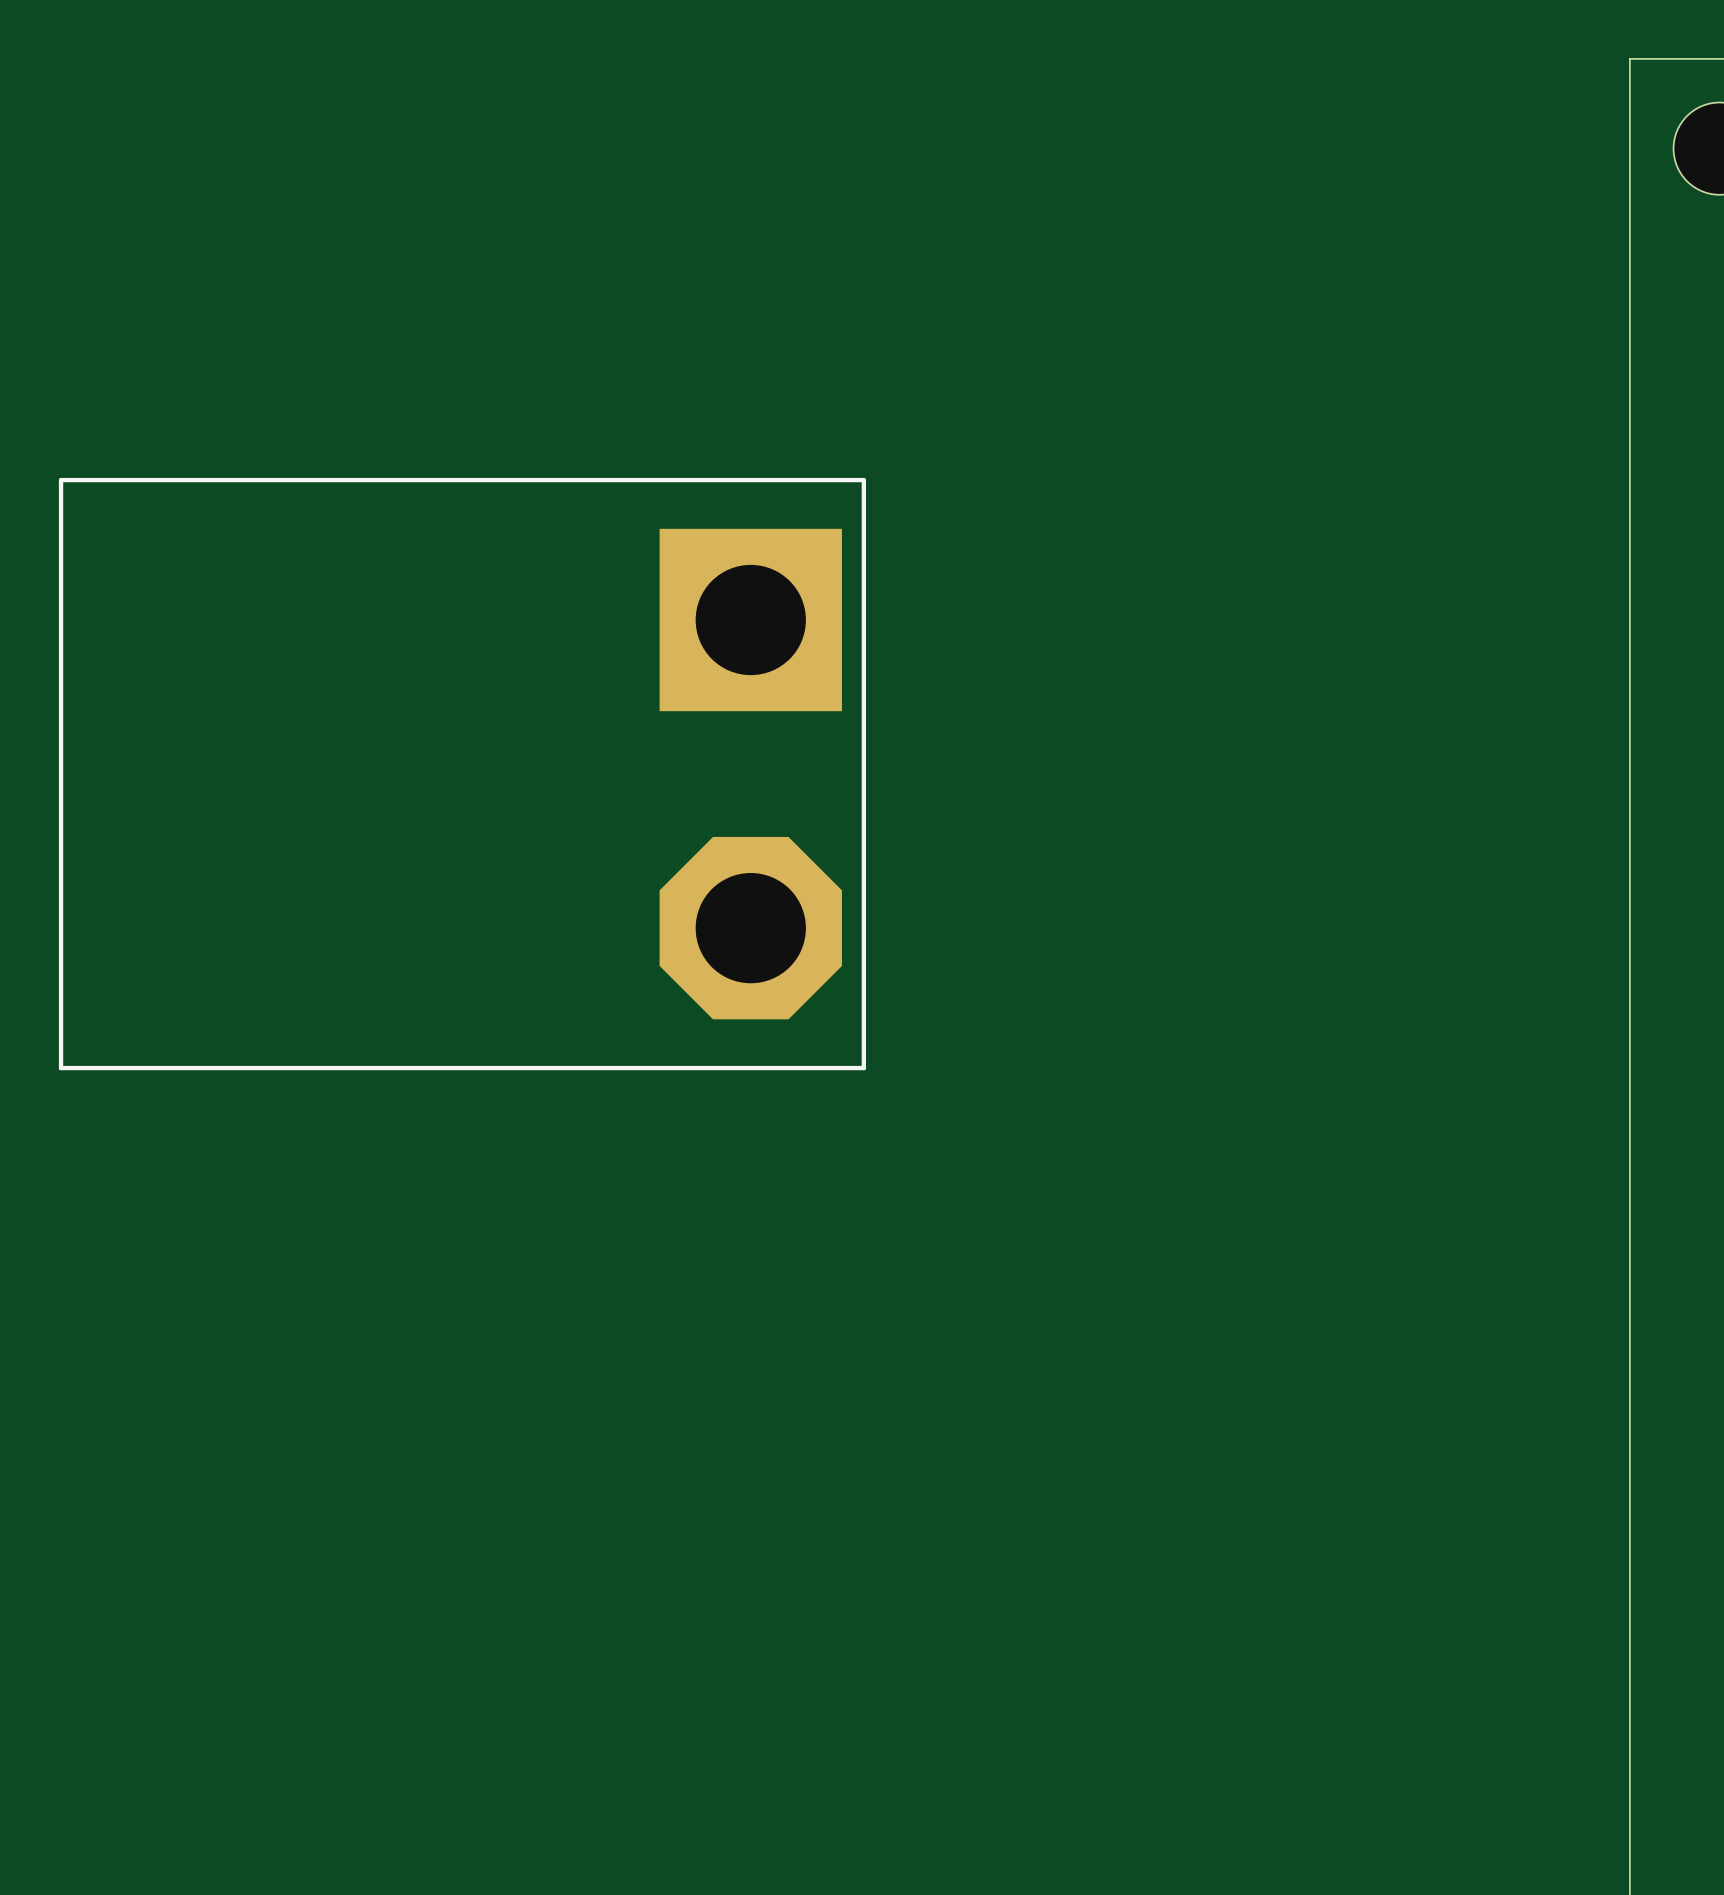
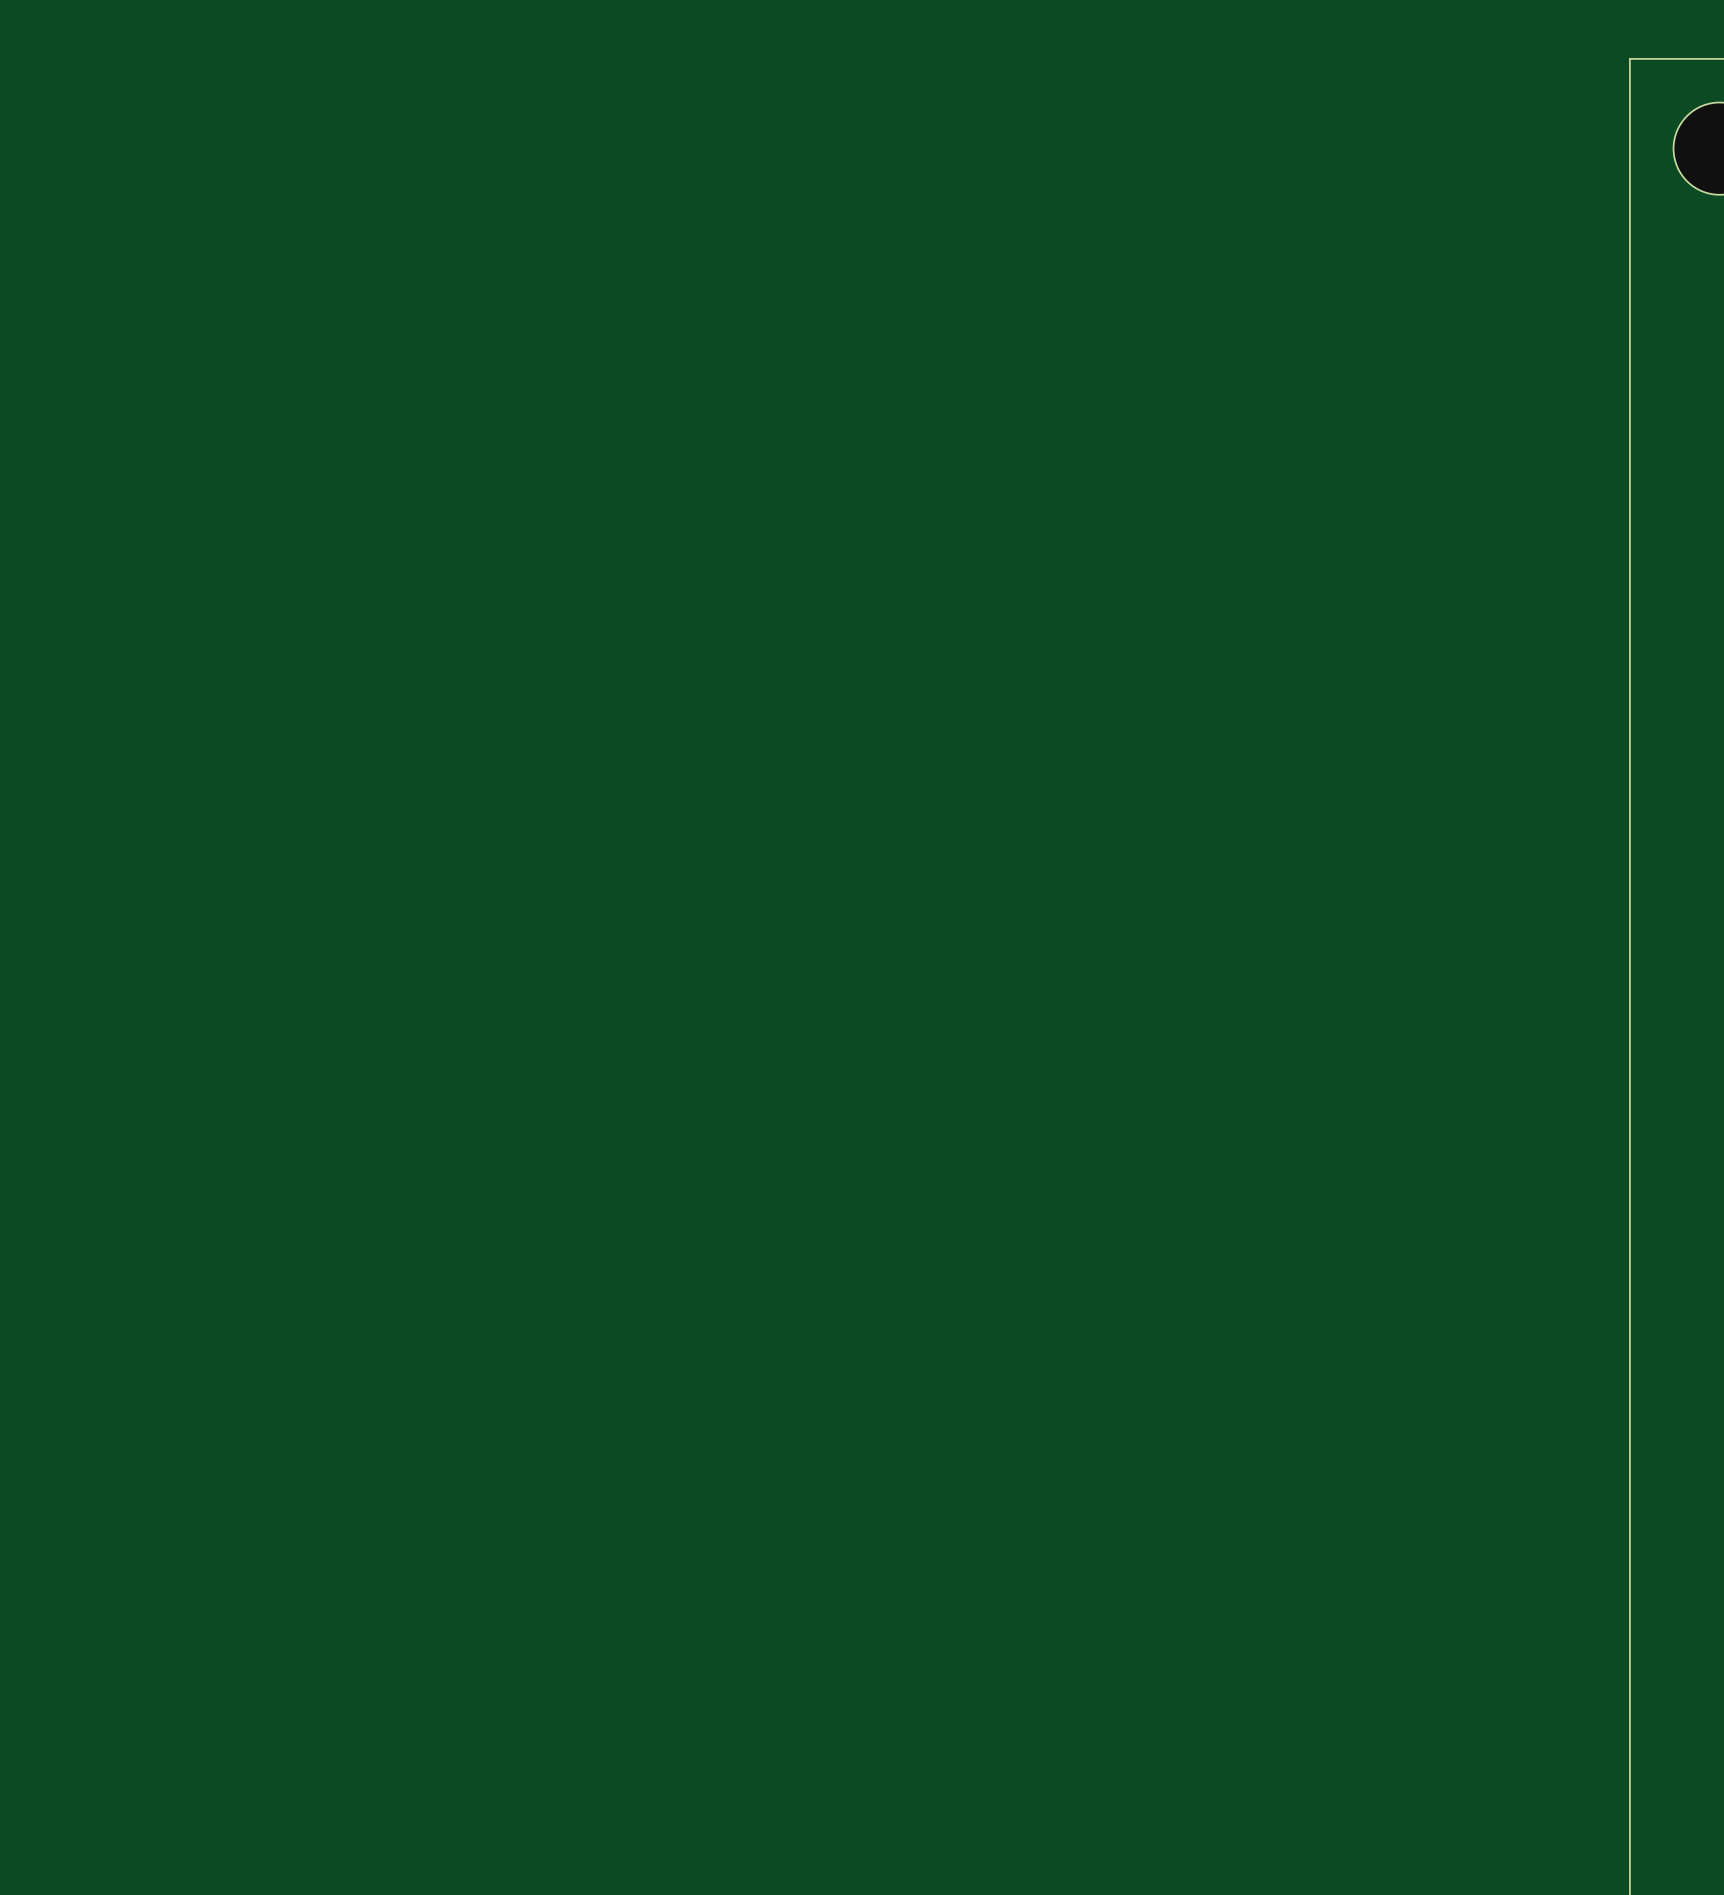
part: (462, 774) -> none

